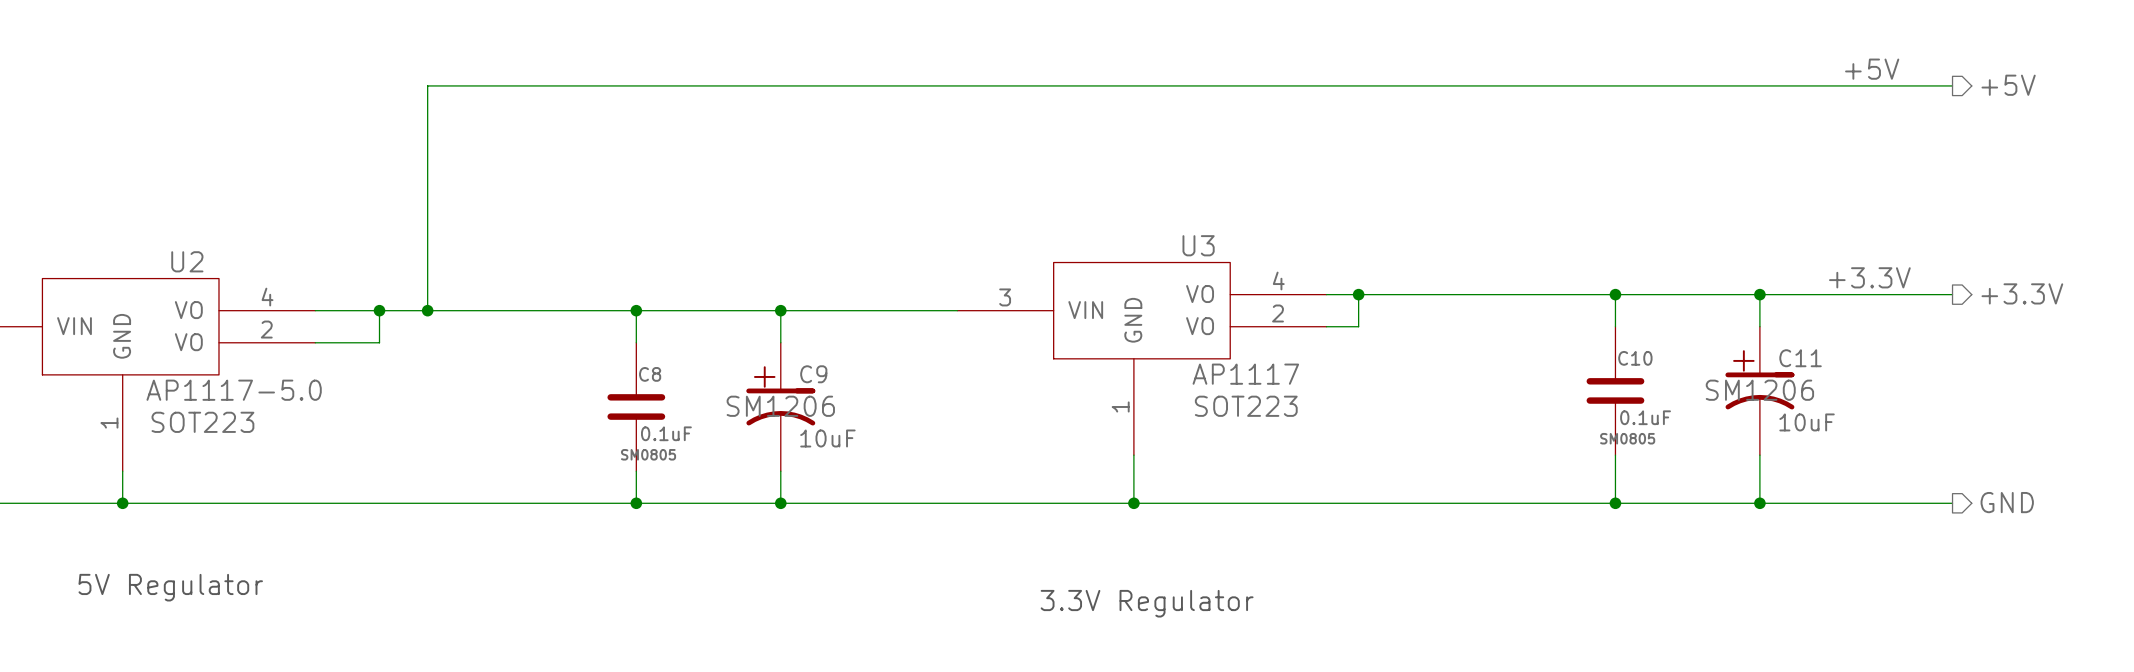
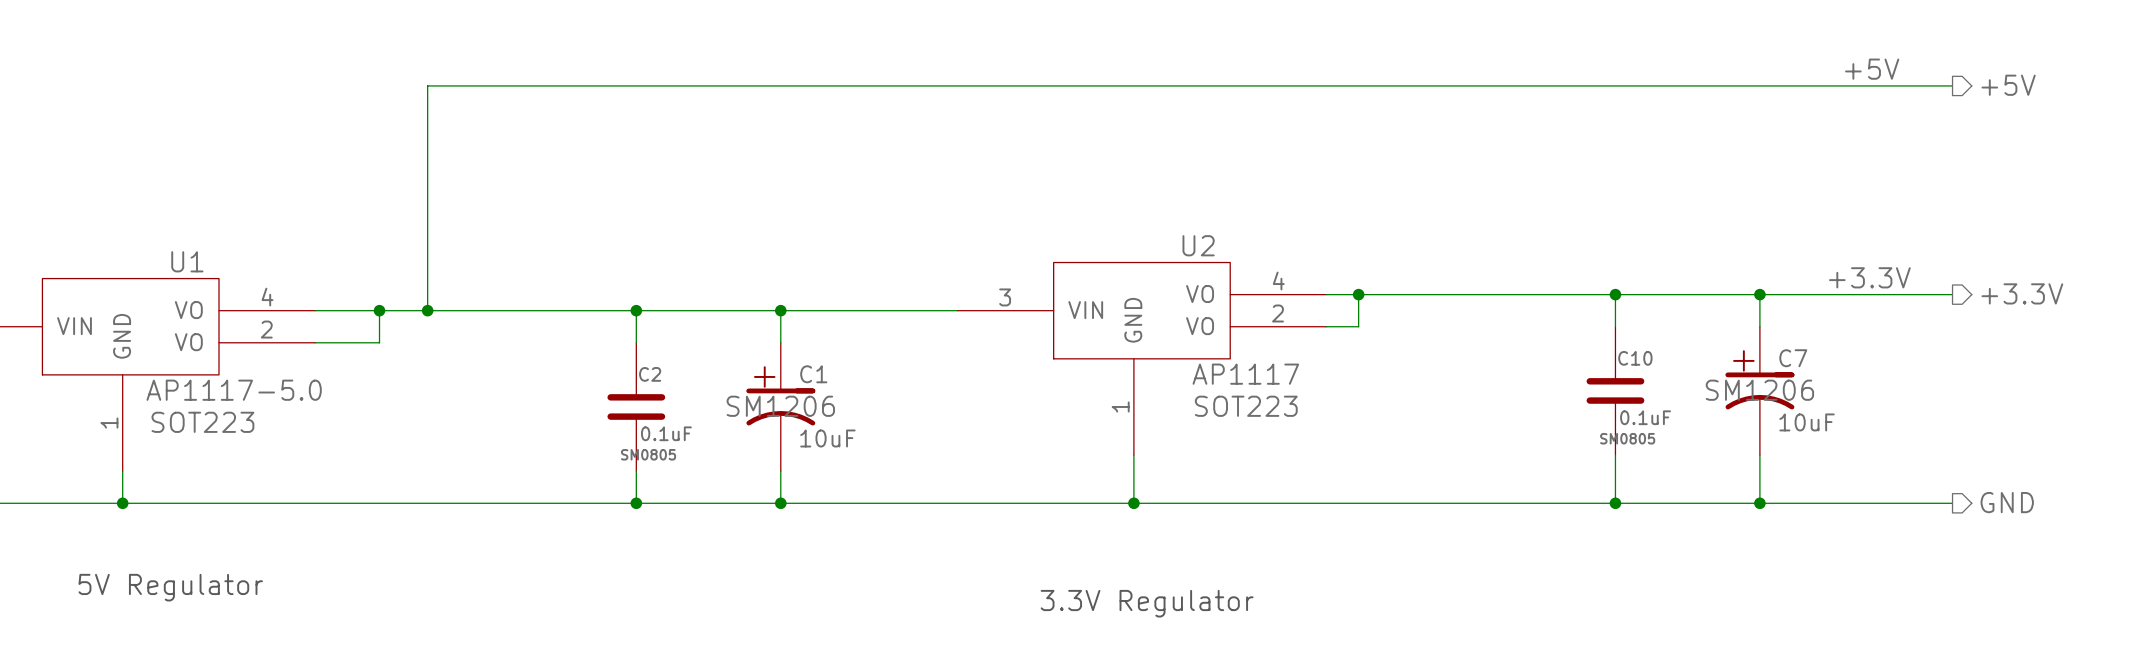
U3 name: U3 (1198, 245) -> U2 (1198, 245)
U2 name: U2 (187, 261) -> U1 (187, 261)
C11 name: C11 (1800, 358) -> C7 (1793, 358)
C8 name: C8 (650, 374) -> C2 (650, 374)
C9 name: C9 (813, 374) -> C1 (813, 374)

